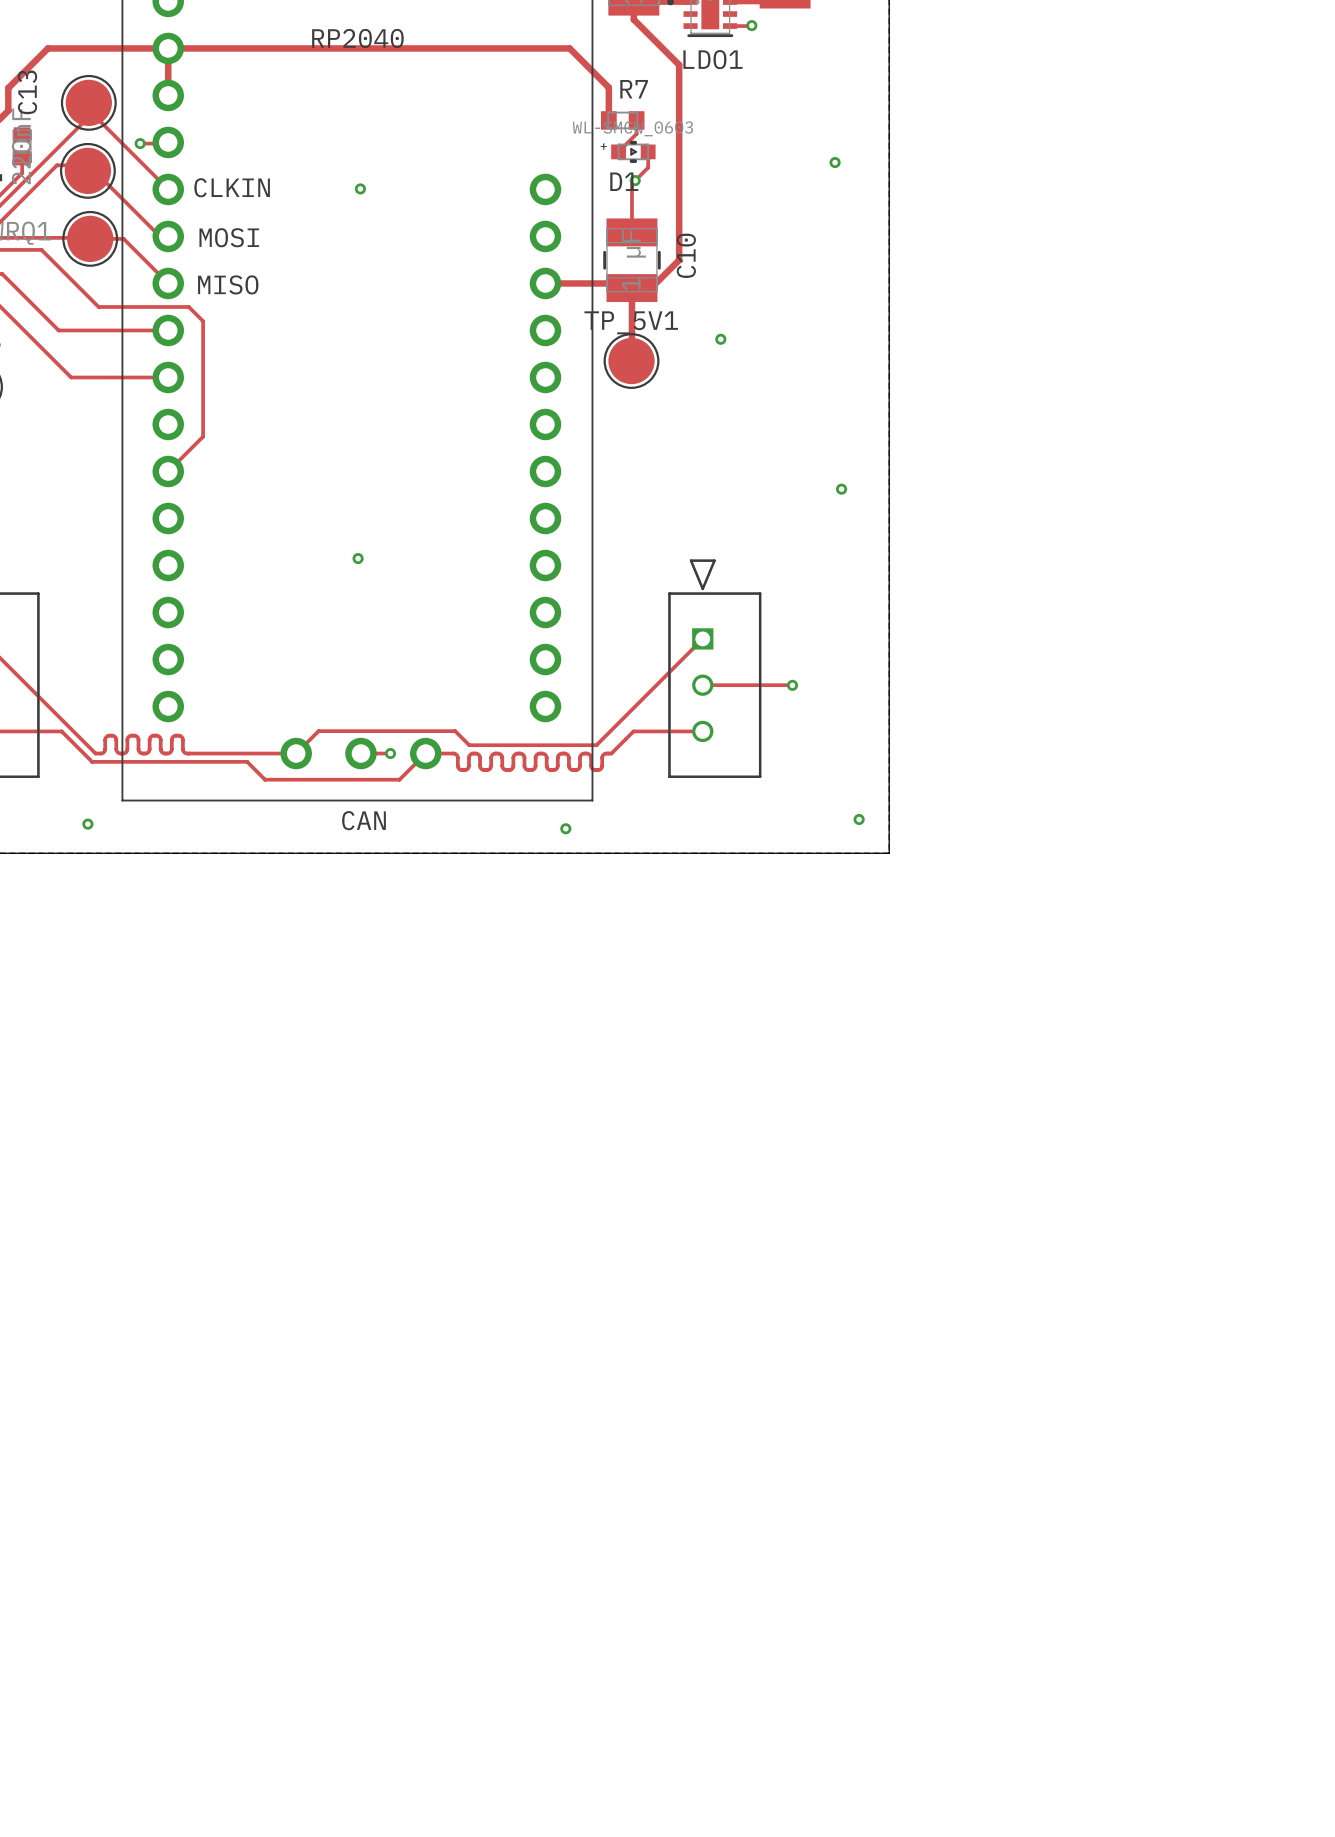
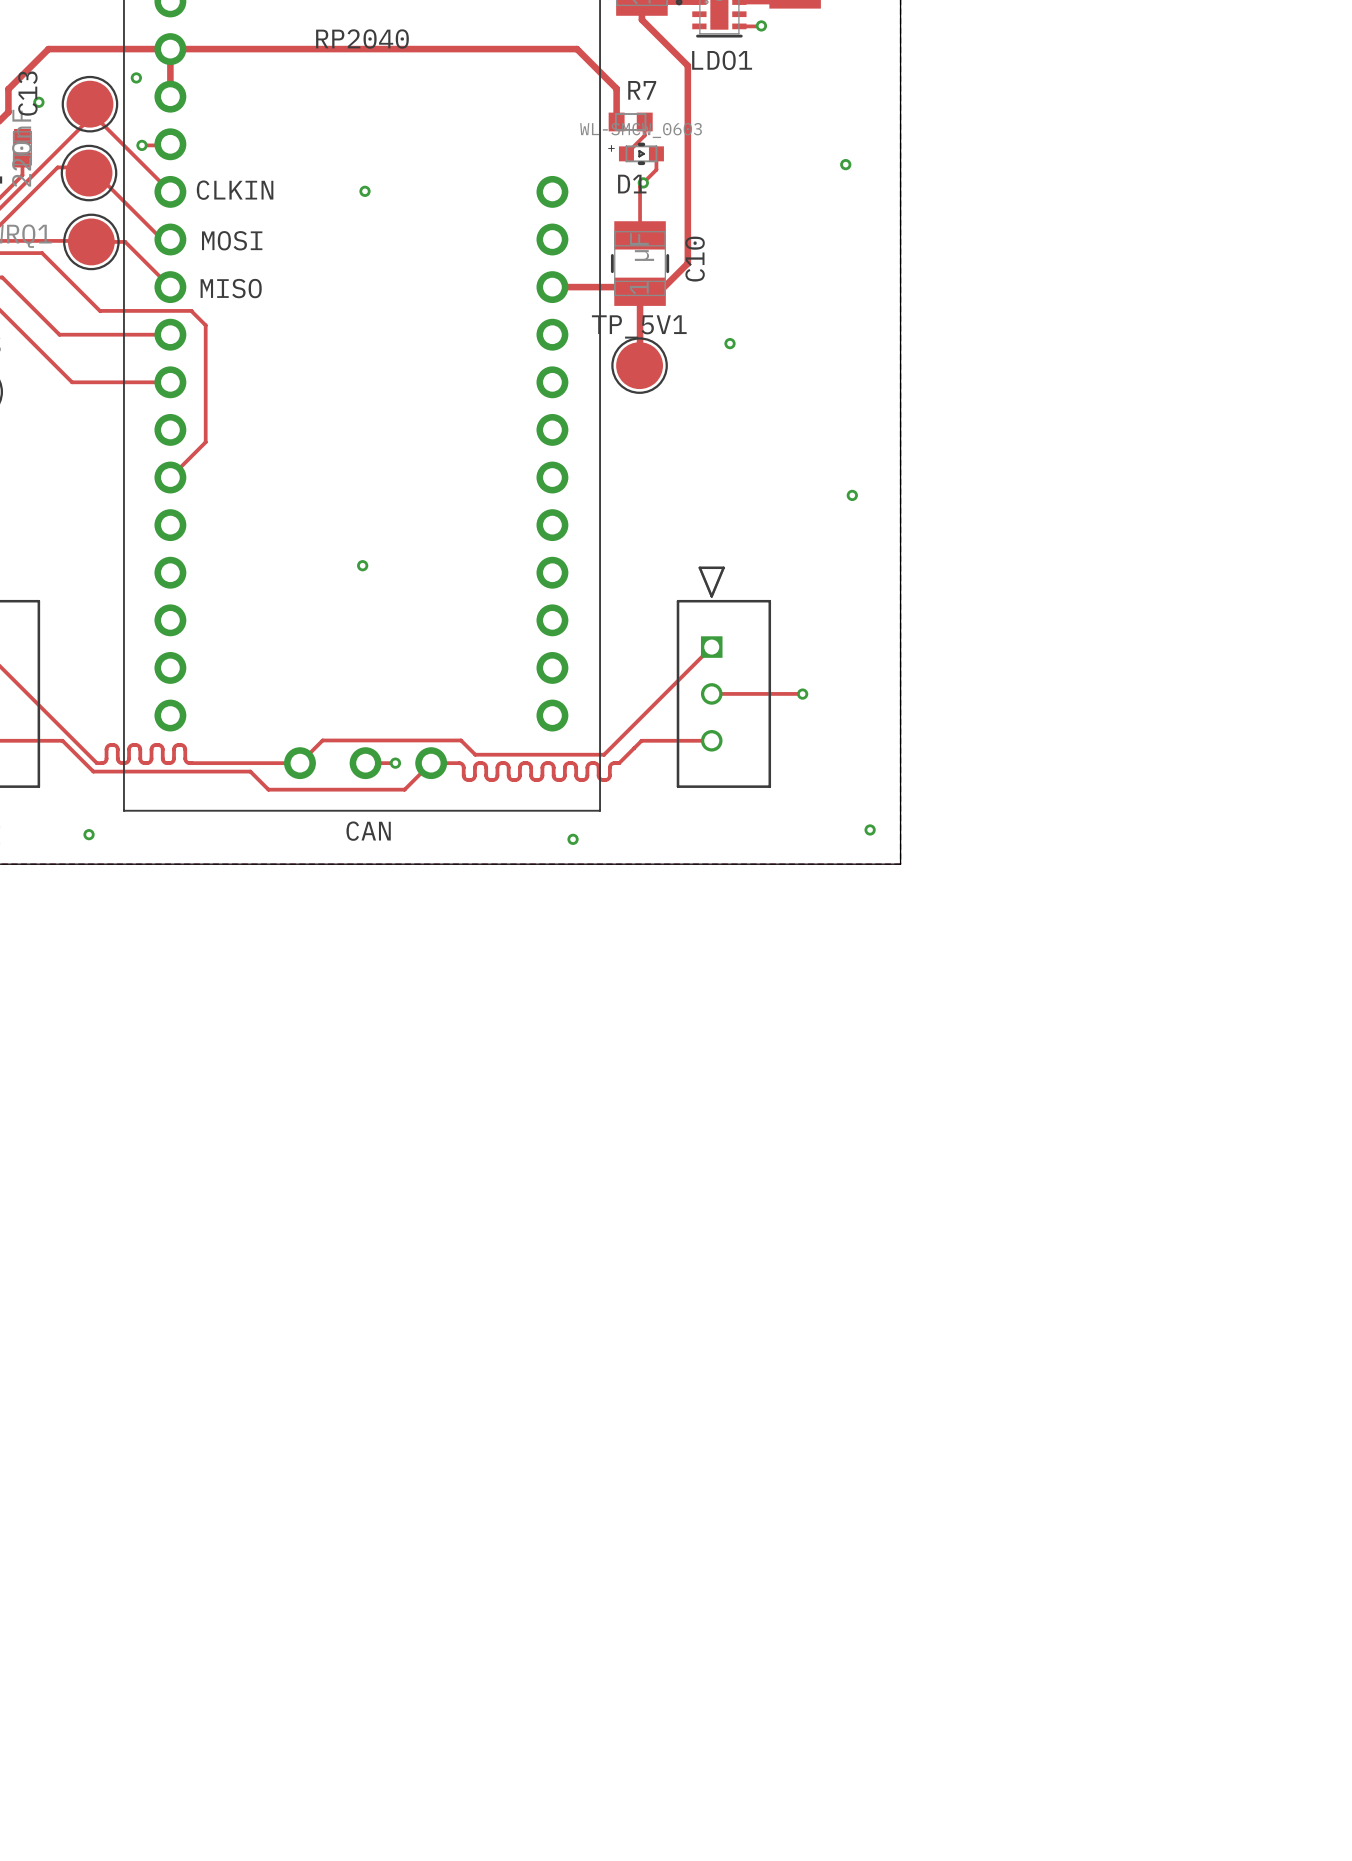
via: none -> (136, 77)
via: none -> (38, 102)

